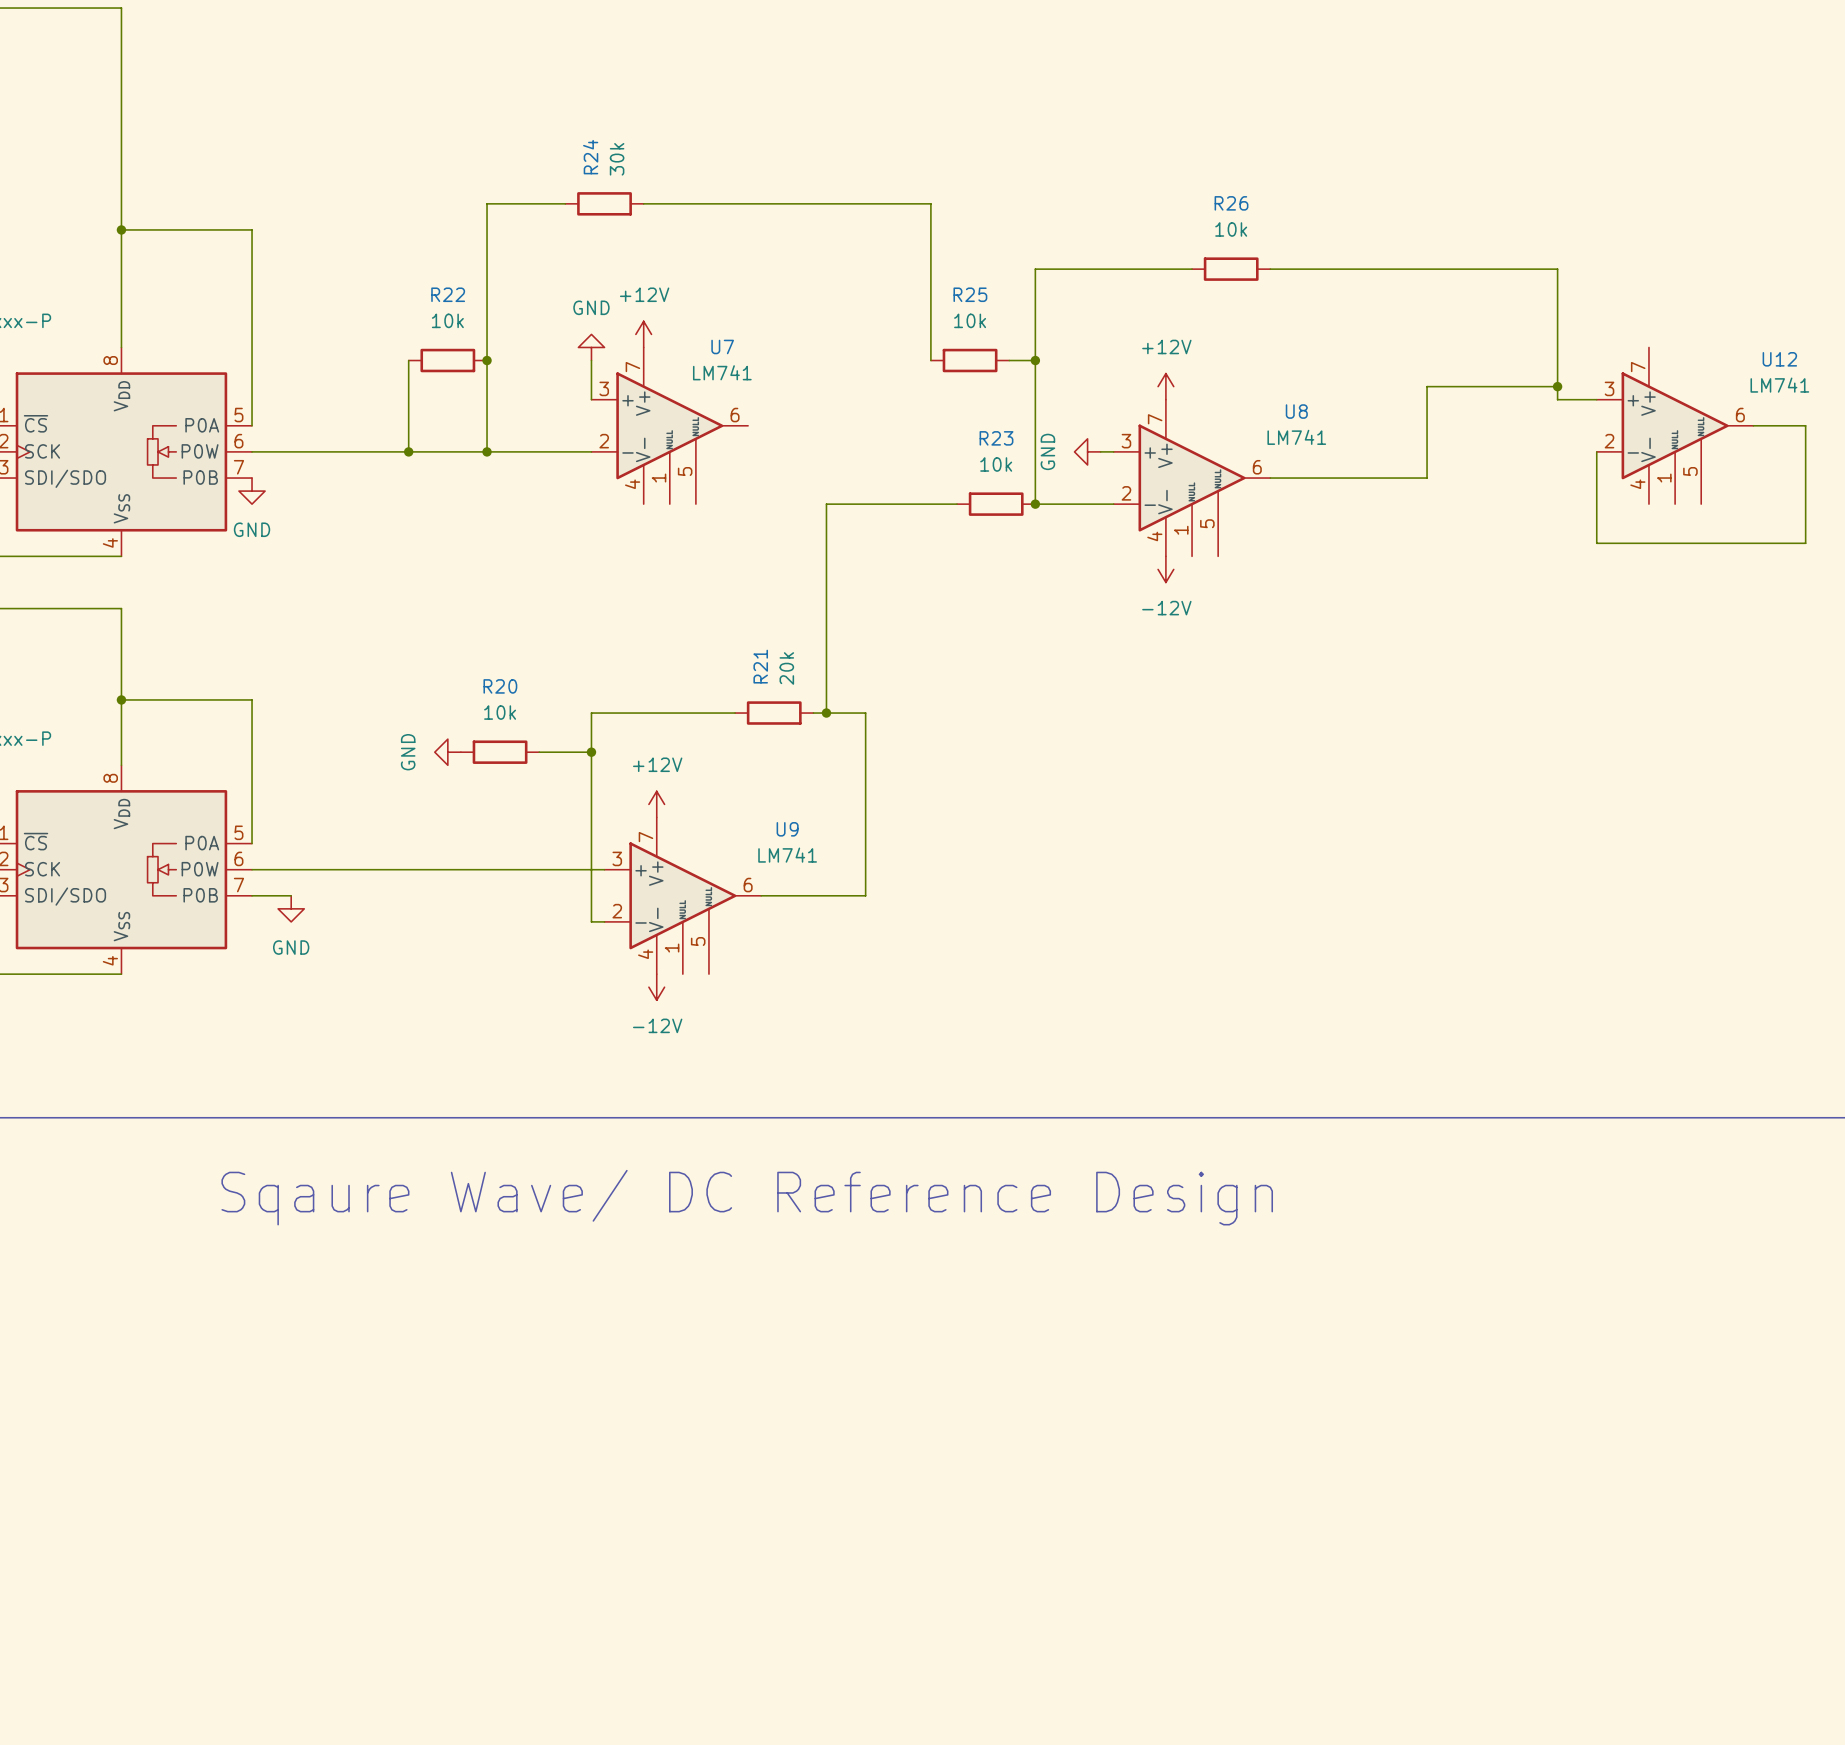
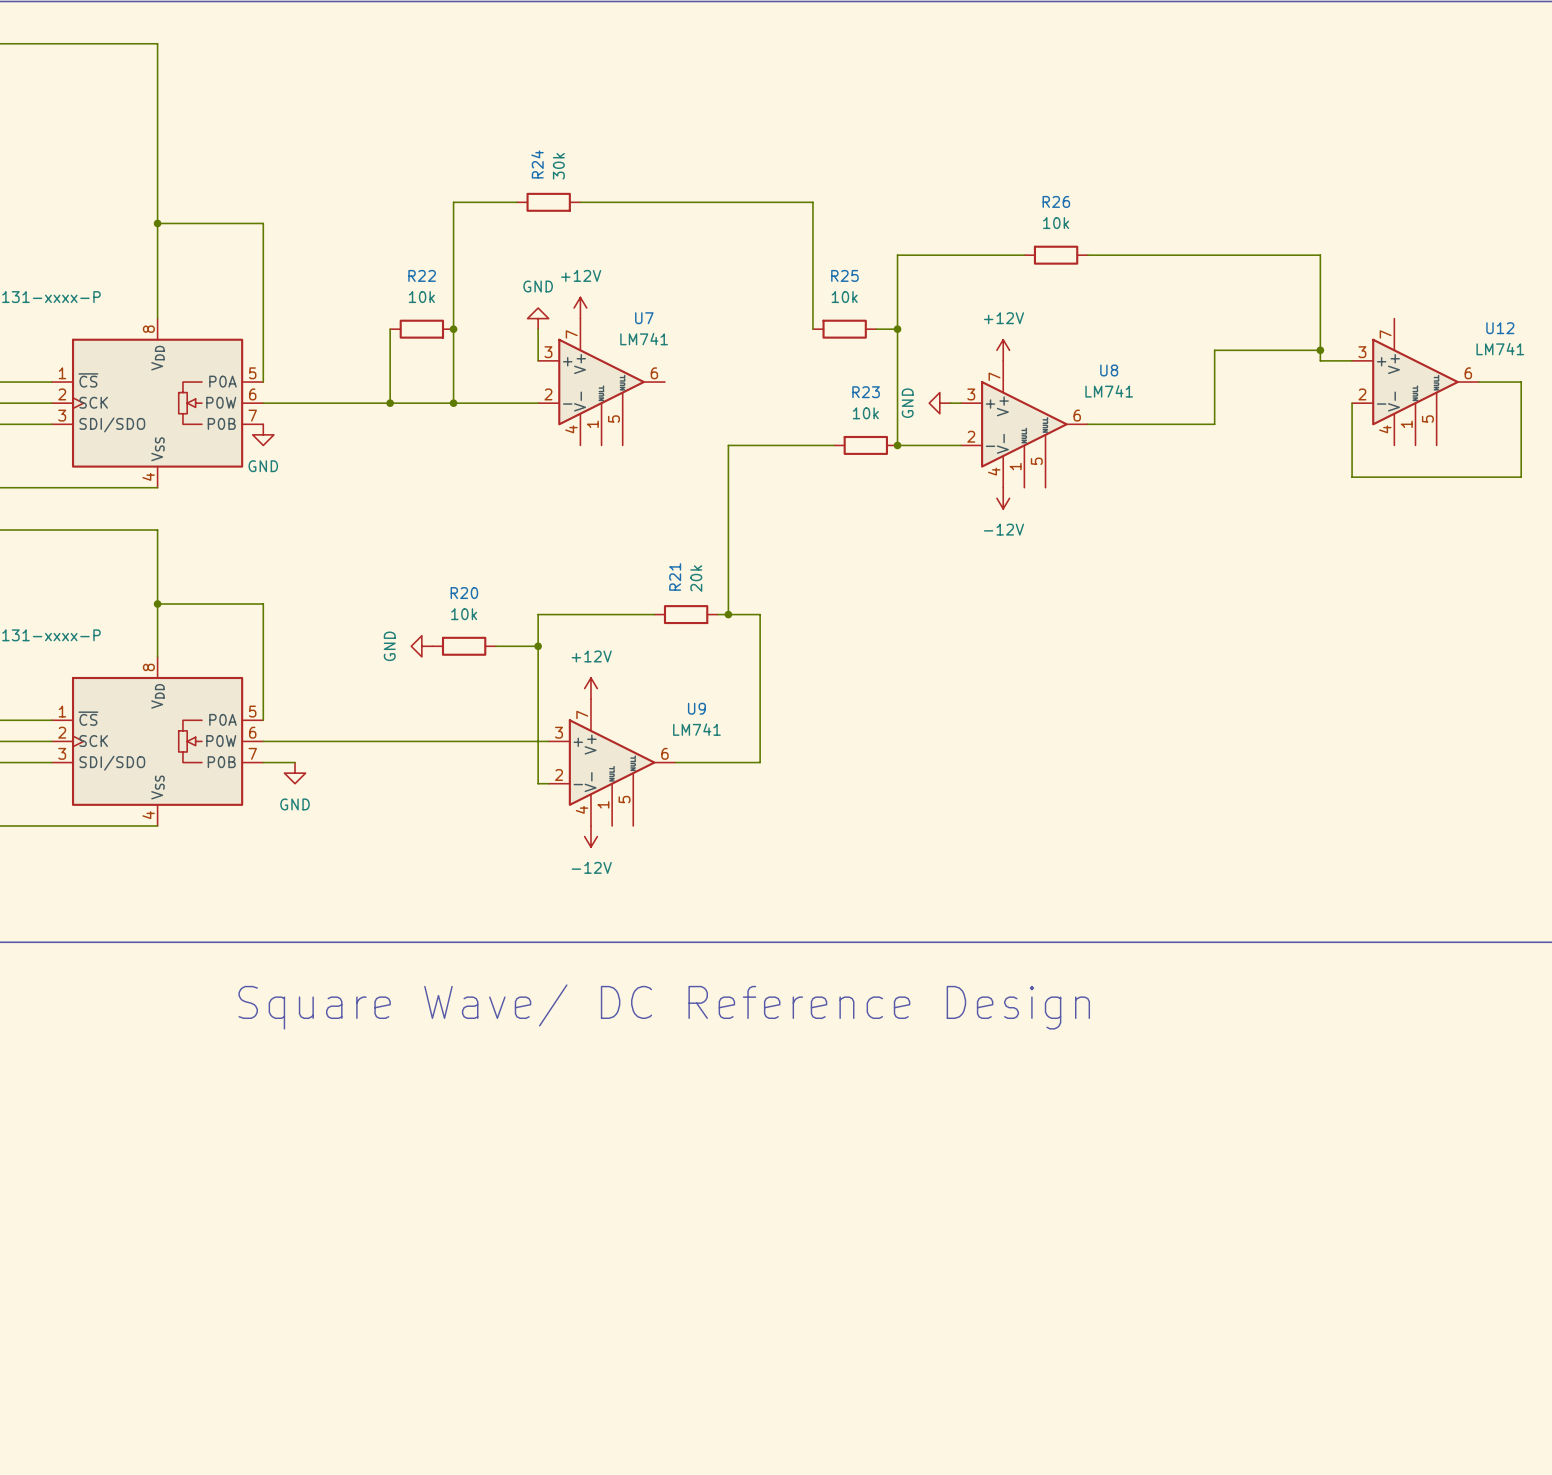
text: Sqaure Wave/ DC Reference Design (747, 1197) -> Square Wave/ DC Reference Design (664, 1006)

